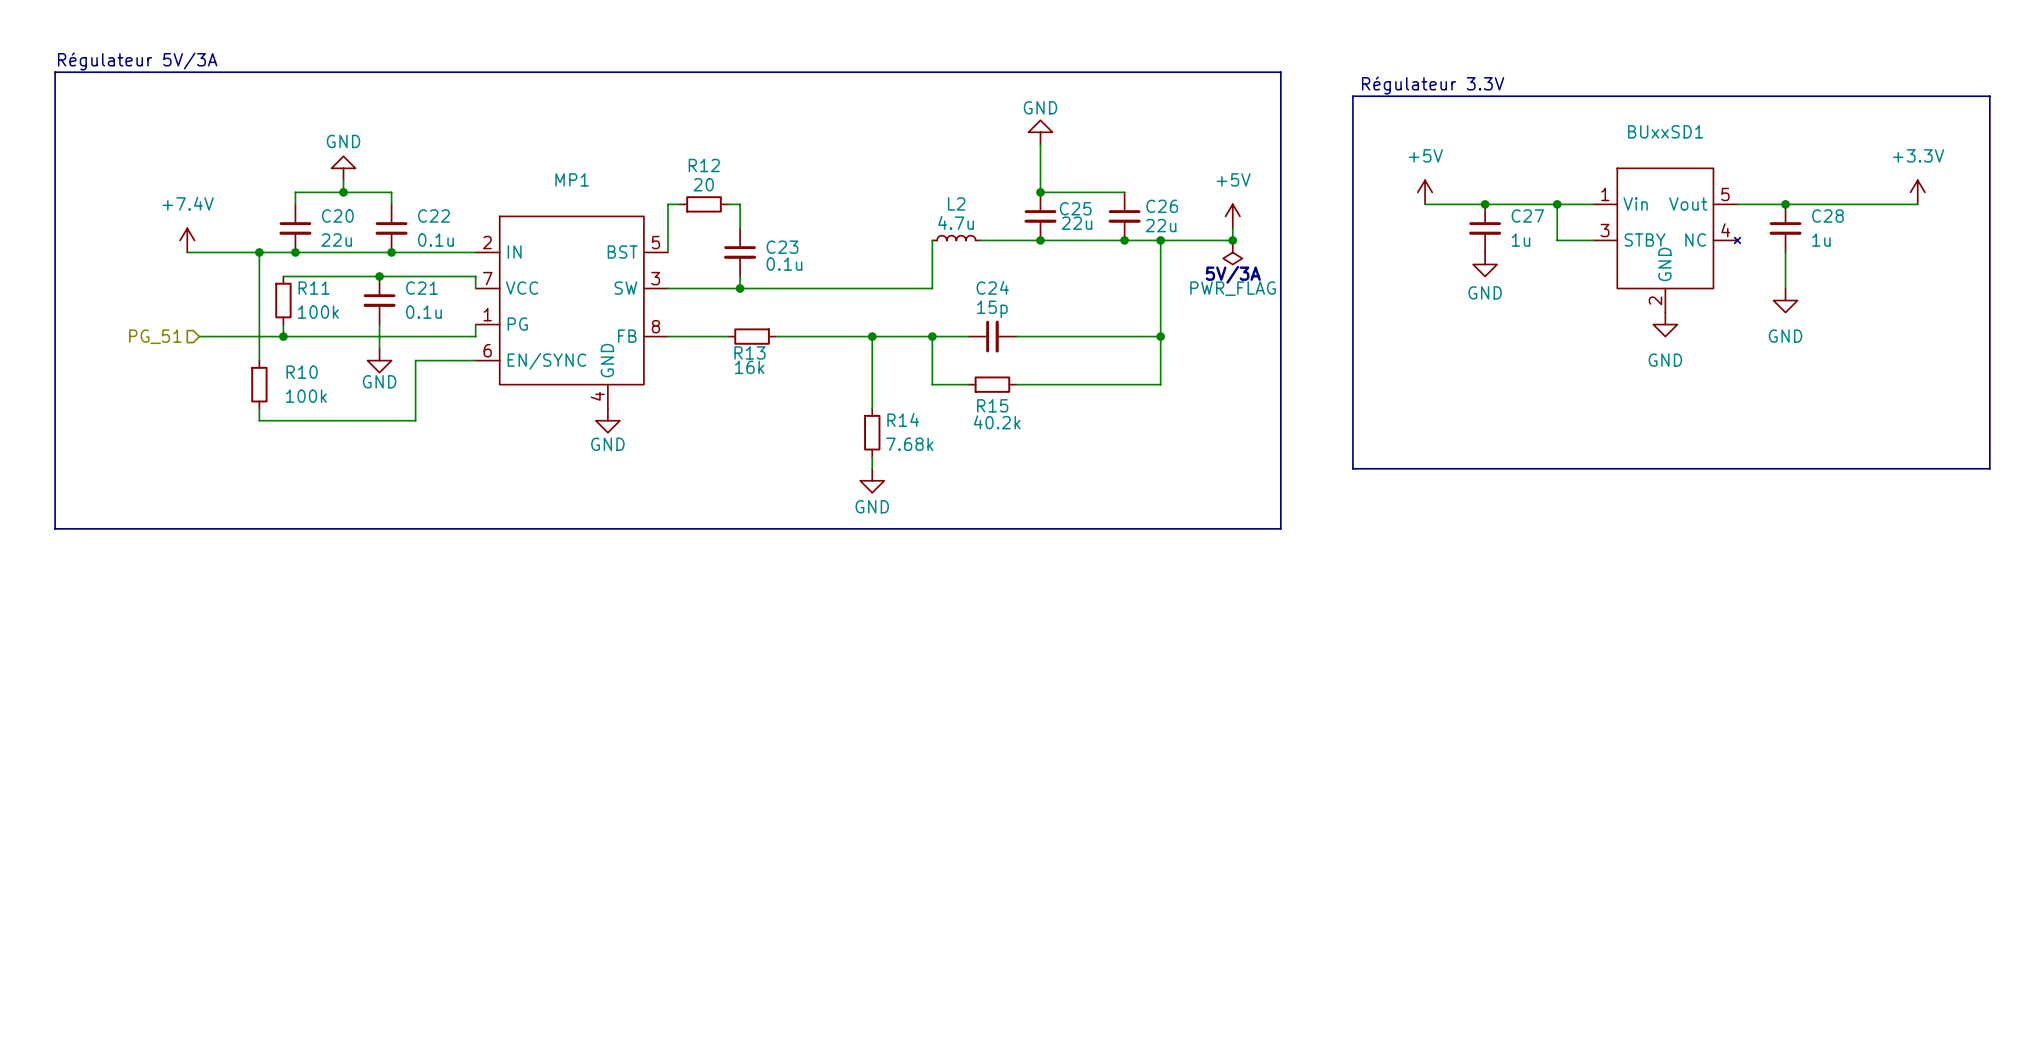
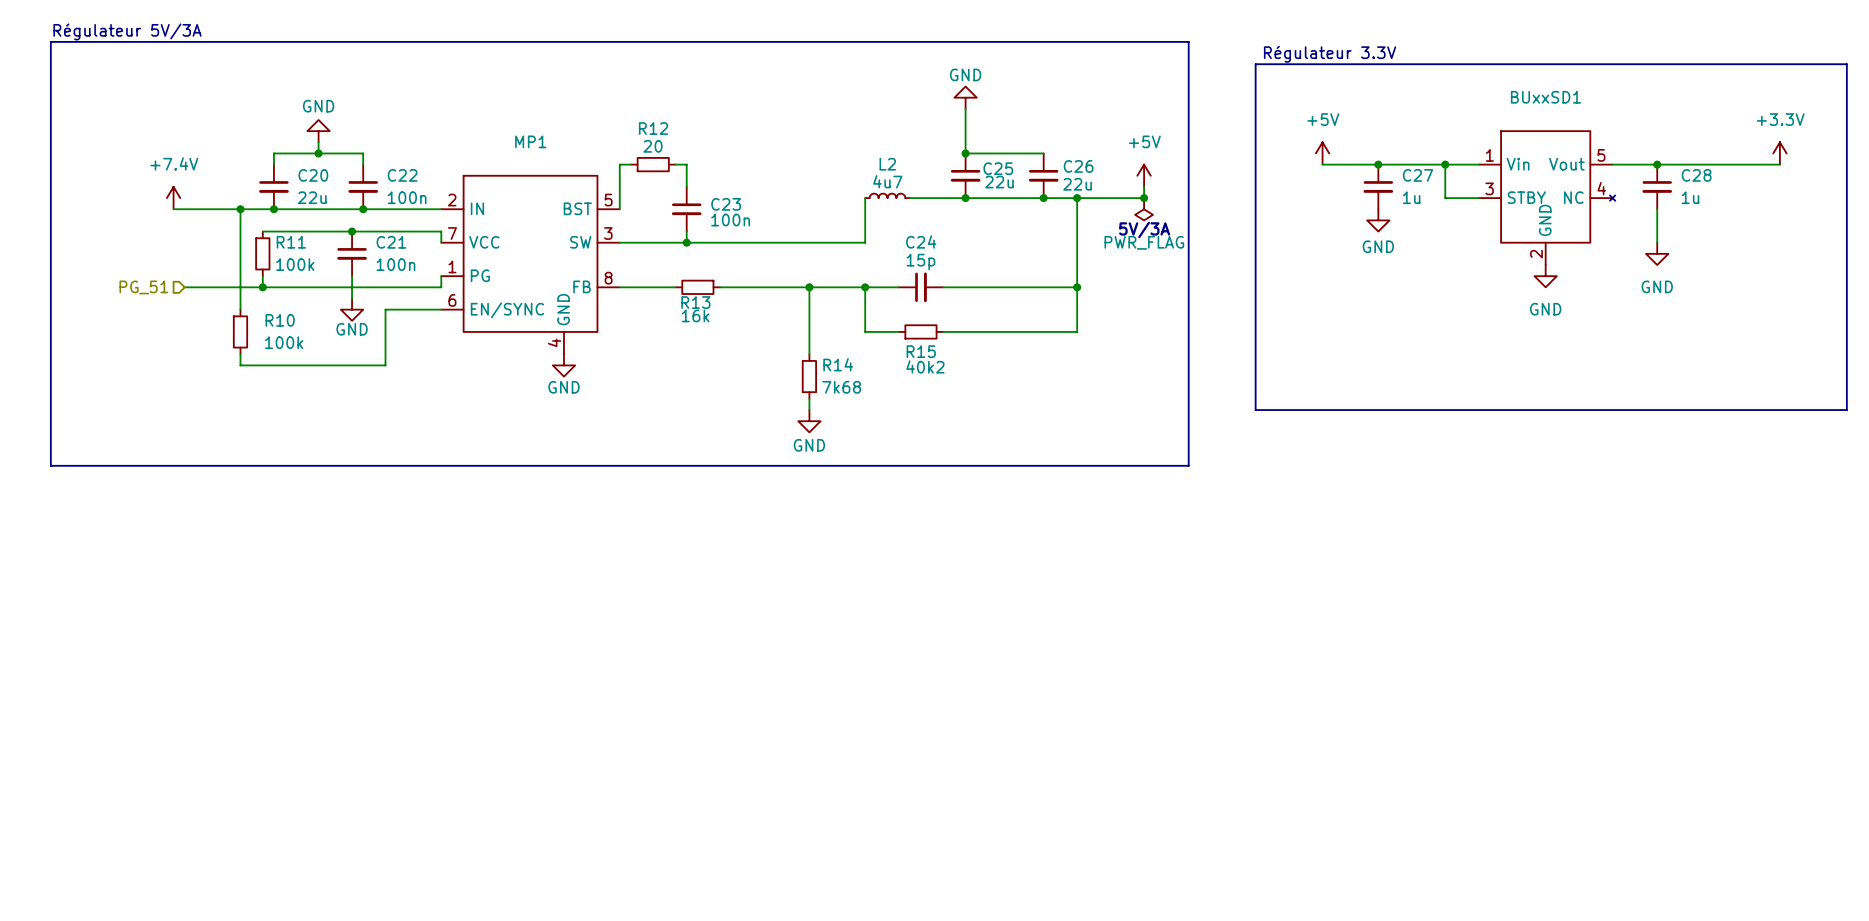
L2 value: 4.7u (956, 222) -> 4u7 (887, 181)
C22 value: 0.1u (436, 240) -> 100n (407, 197)
C23 value: 0.1u (784, 264) -> 100n (730, 220)
C21 value: 0.1u (423, 312) -> 100n (395, 264)
R15 value: 40.2k (997, 422) -> 40k2 (925, 366)
R14 value: 7.68k (909, 444) -> 7k68 (841, 387)

